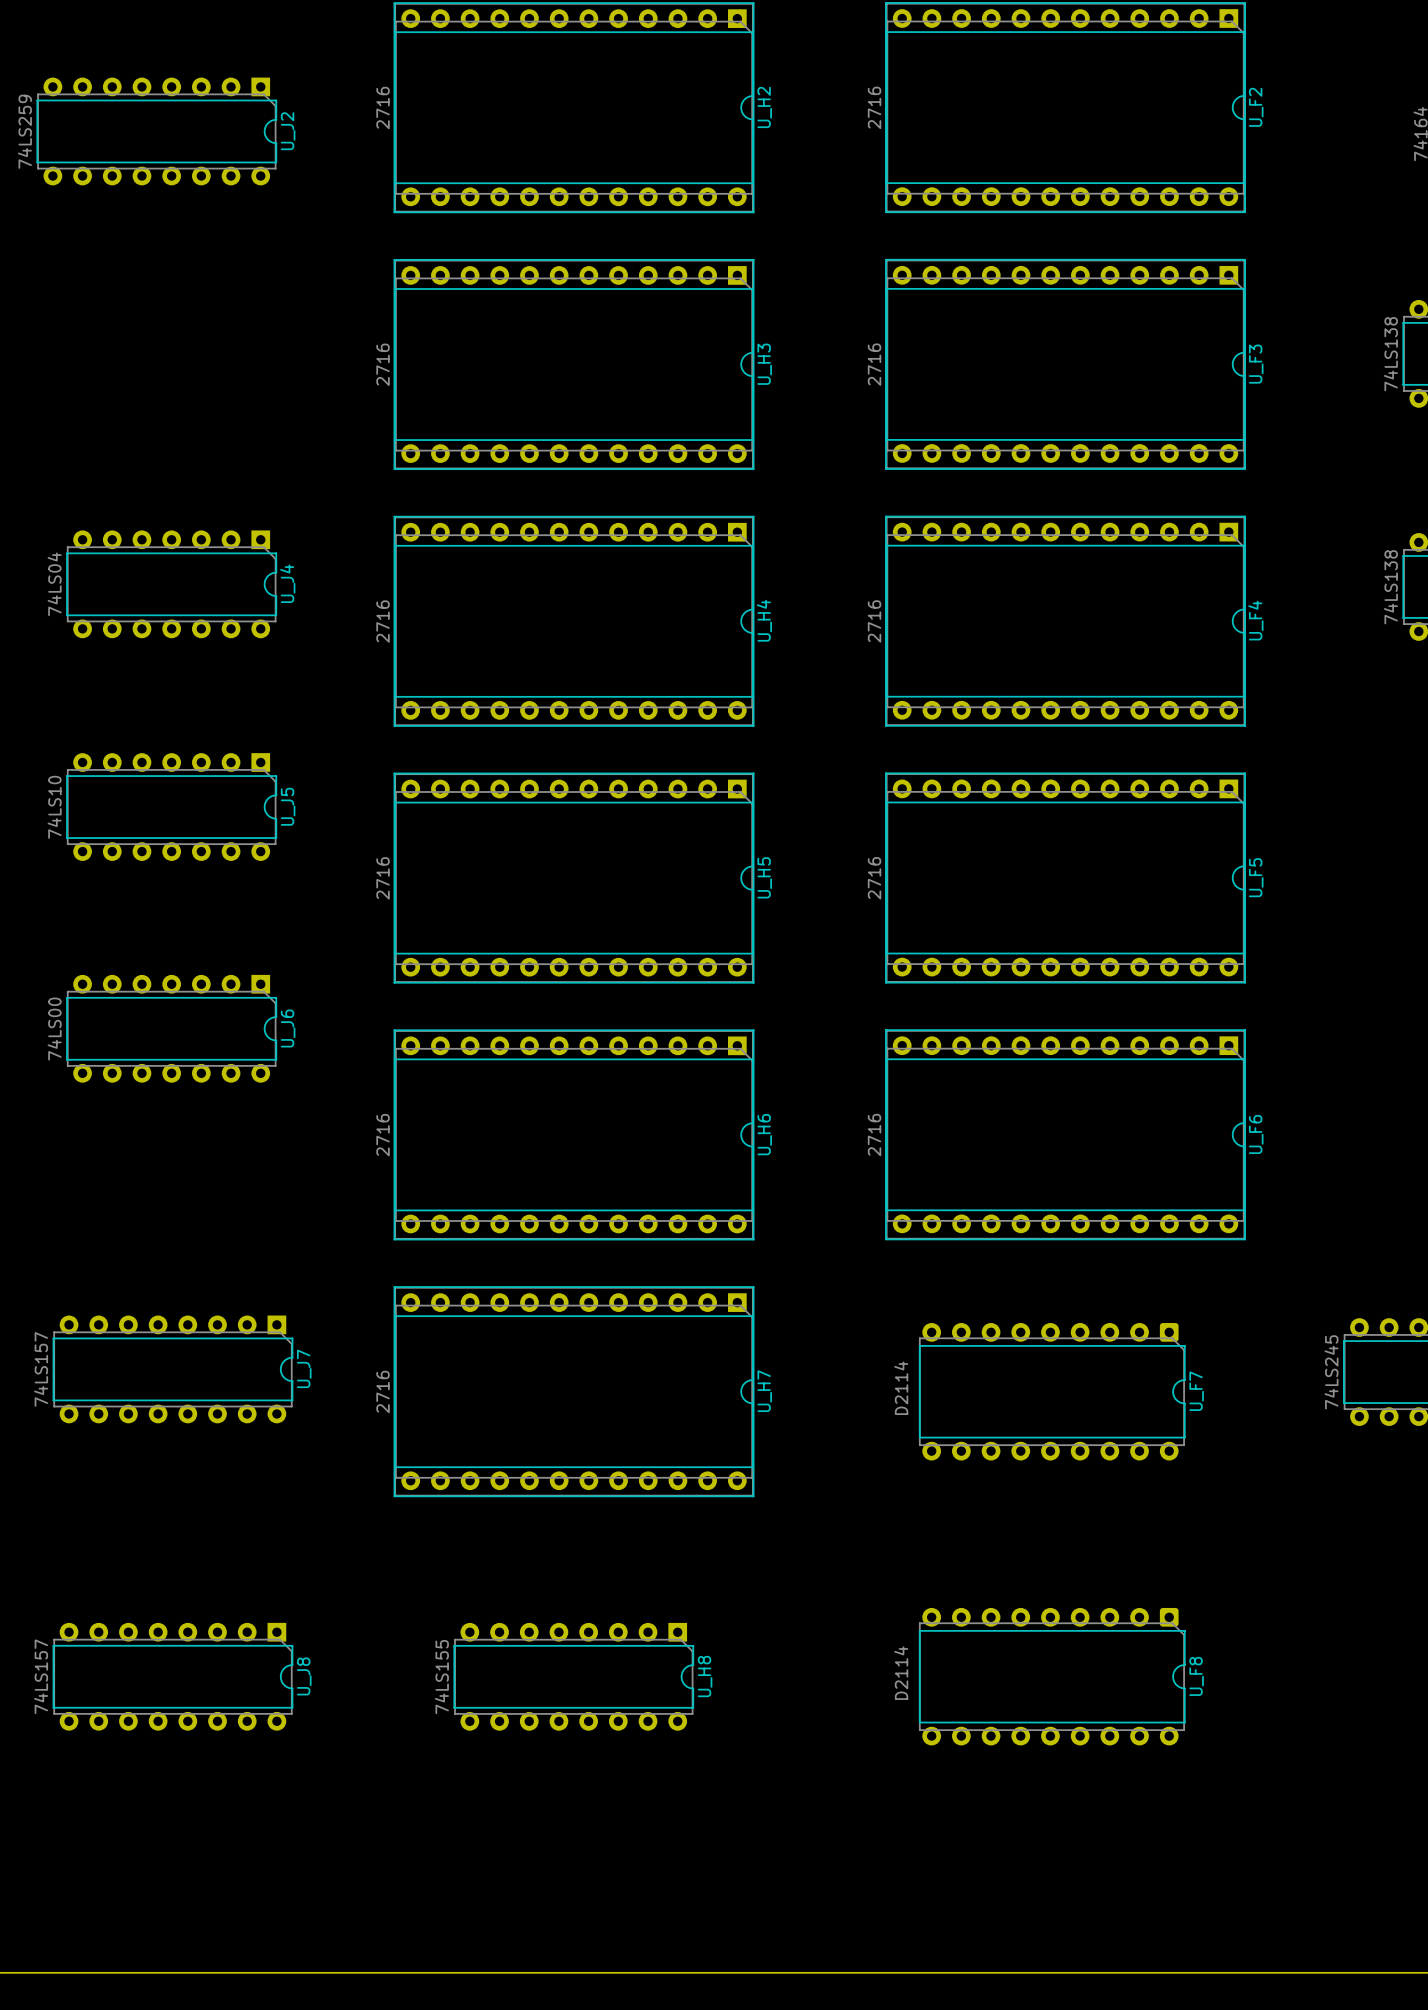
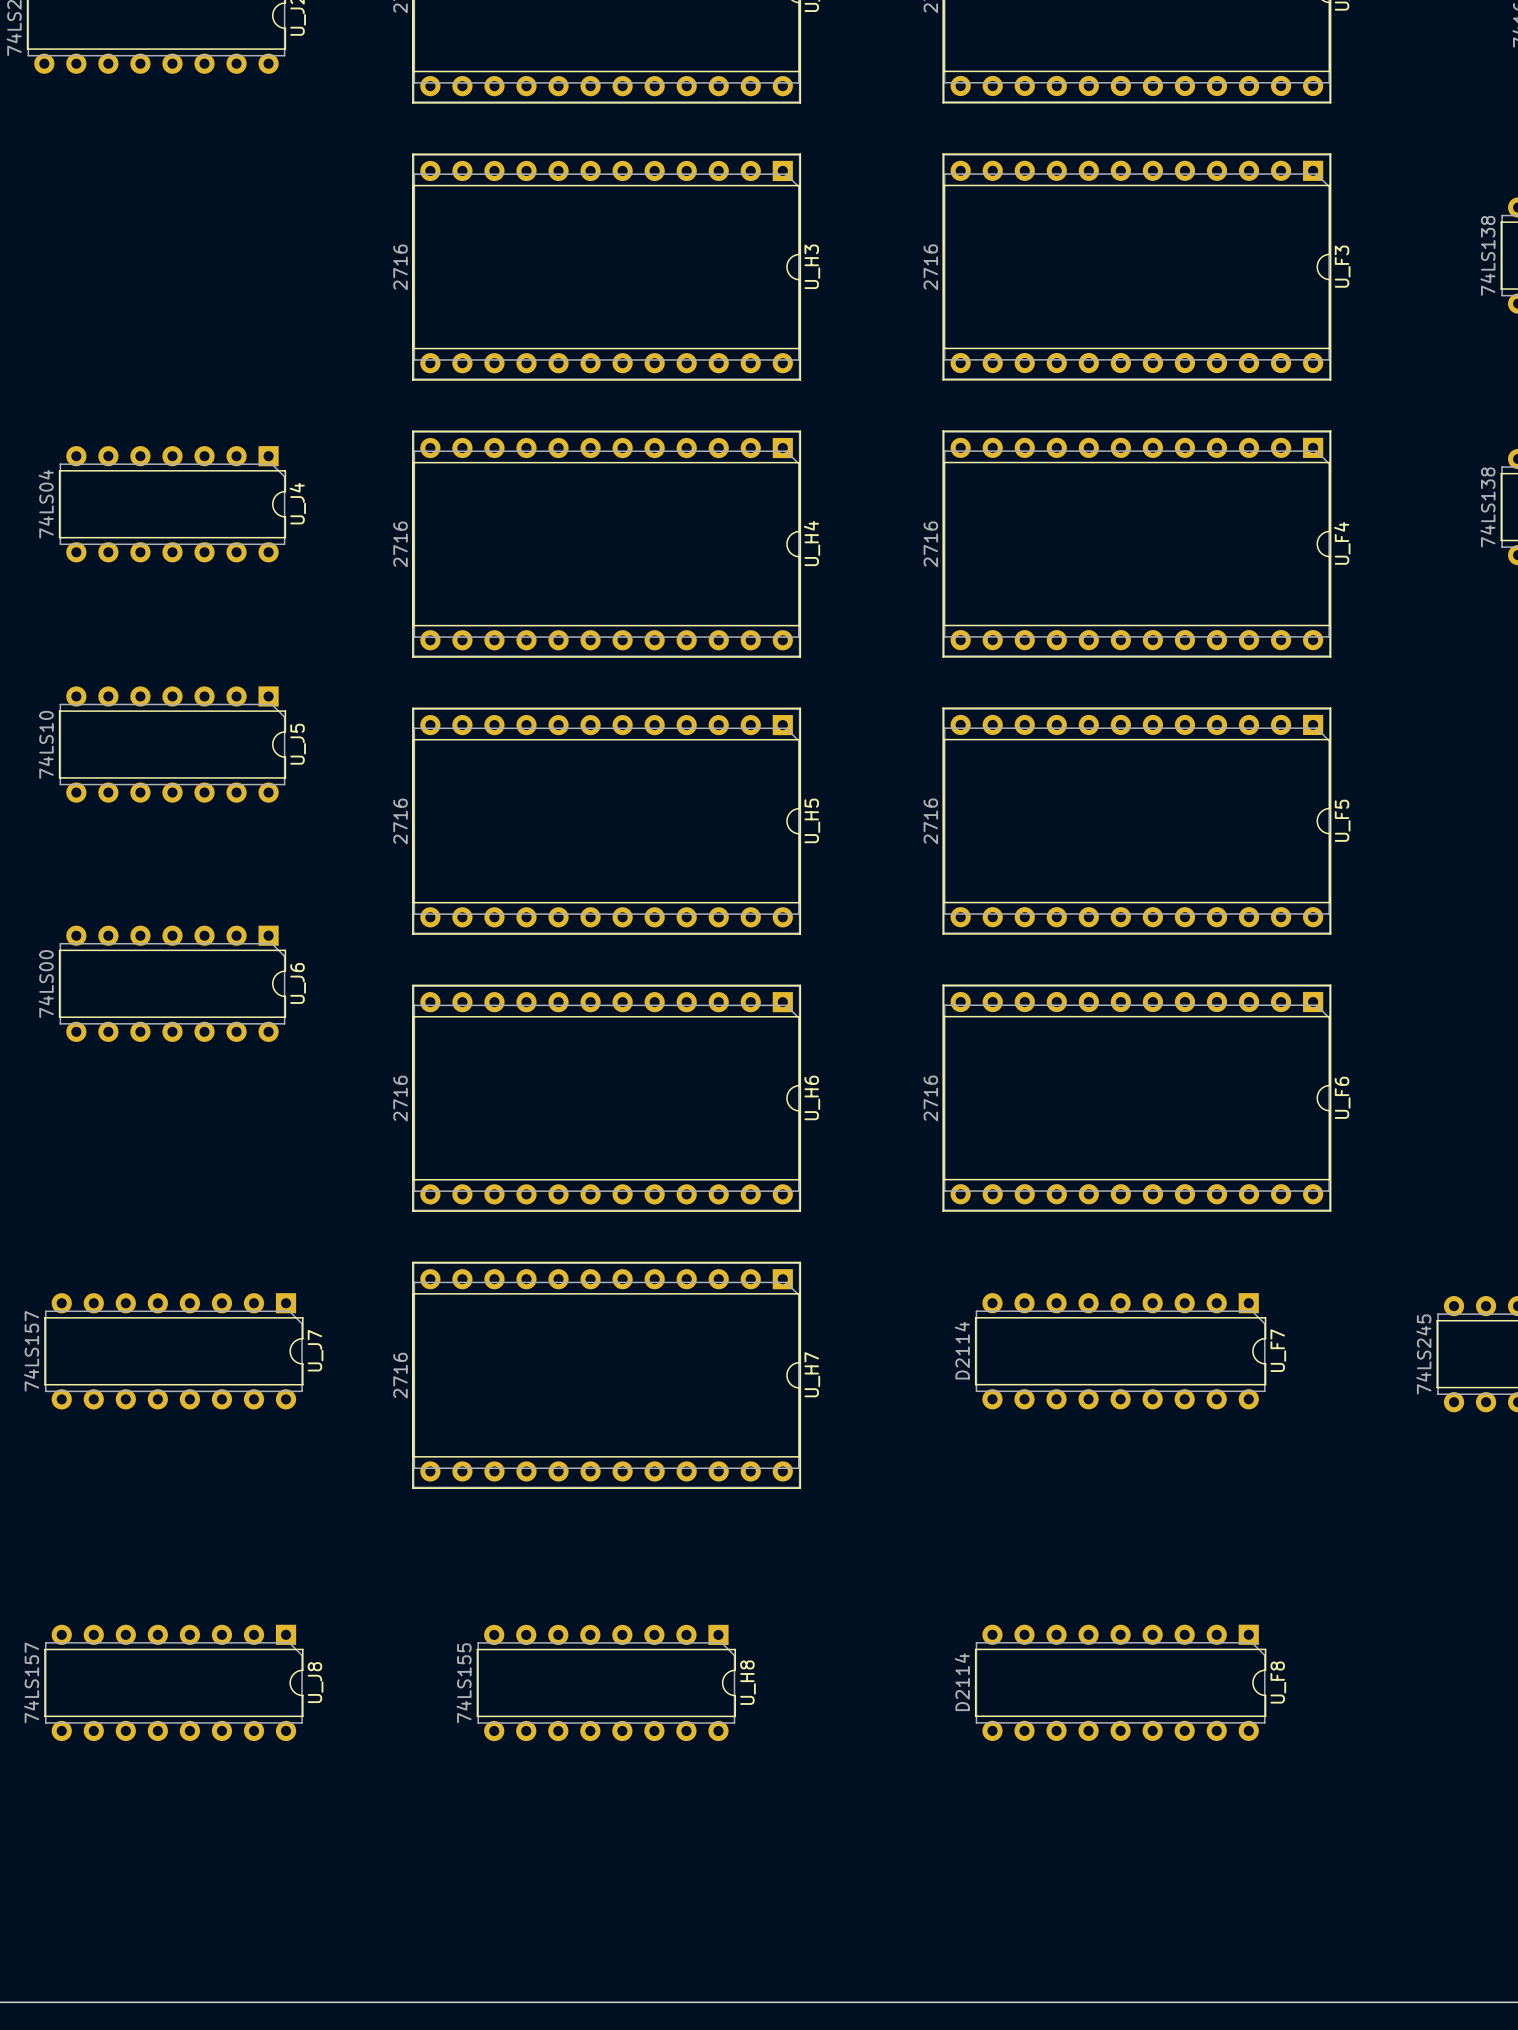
U_F7 footprint: [919, 1323, 1186, 1461] -> [974, 1293, 1267, 1410]
U_F8 footprint: [919, 1607, 1186, 1746] -> [974, 1624, 1267, 1741]

